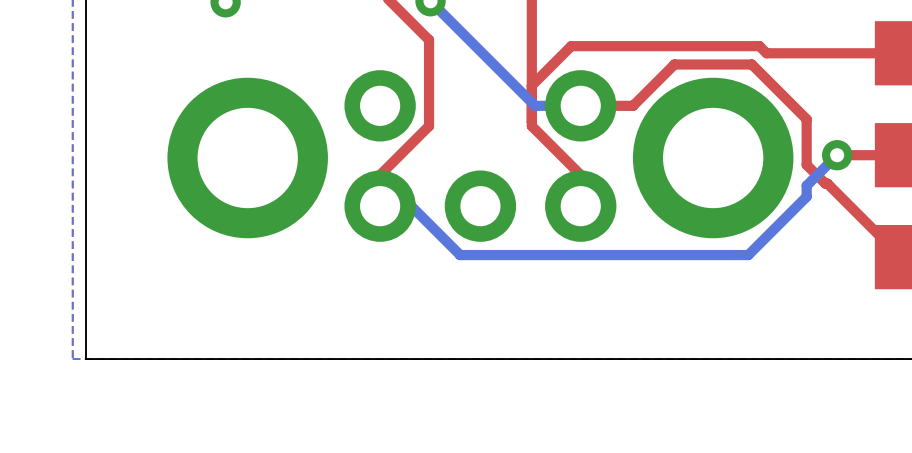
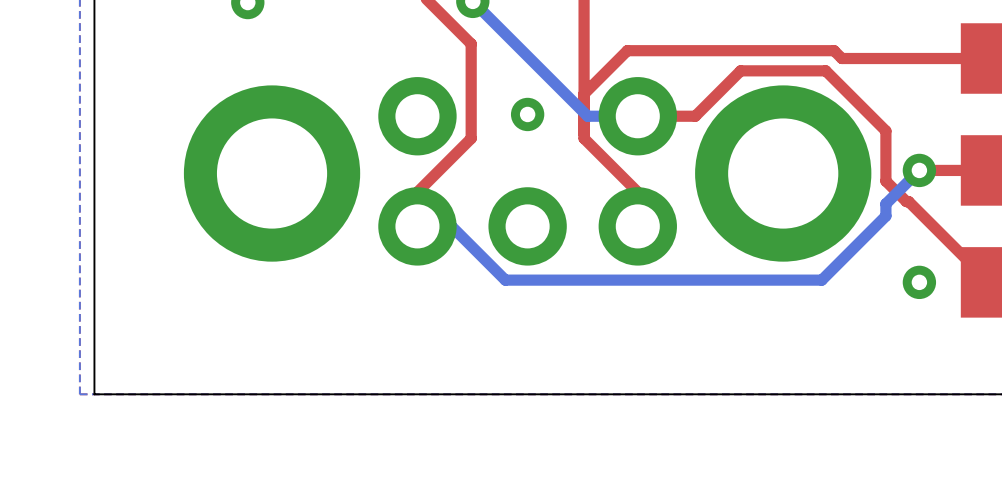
via: none -> (527, 114)
via: none -> (919, 282)

